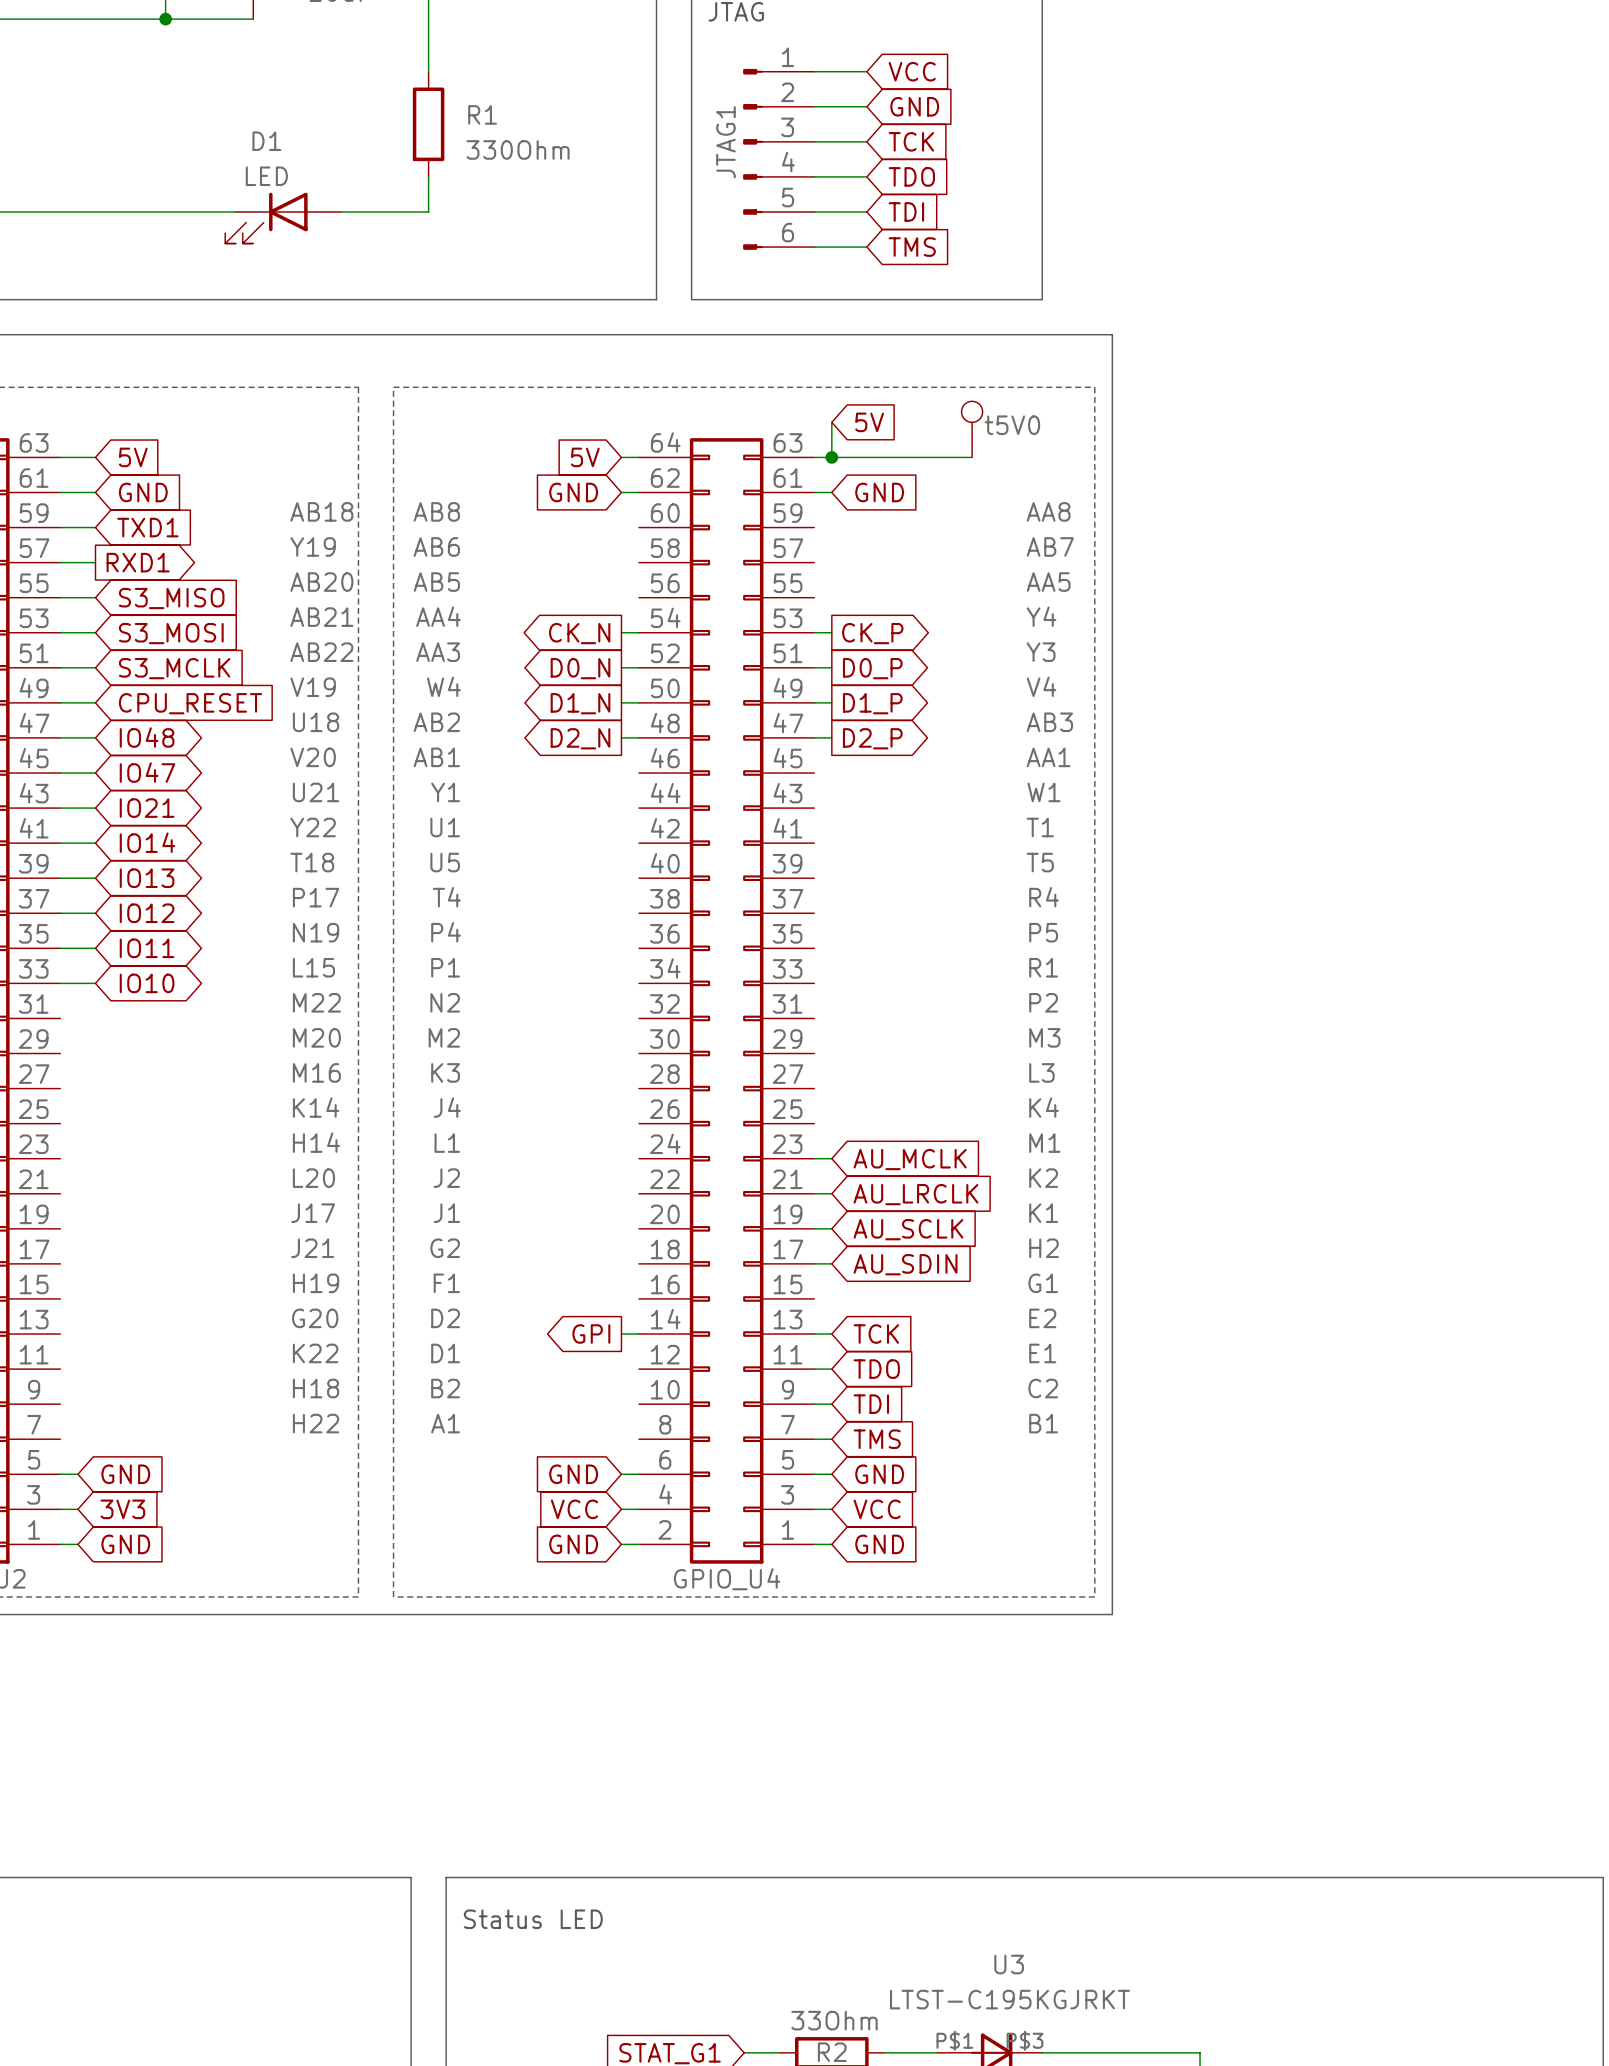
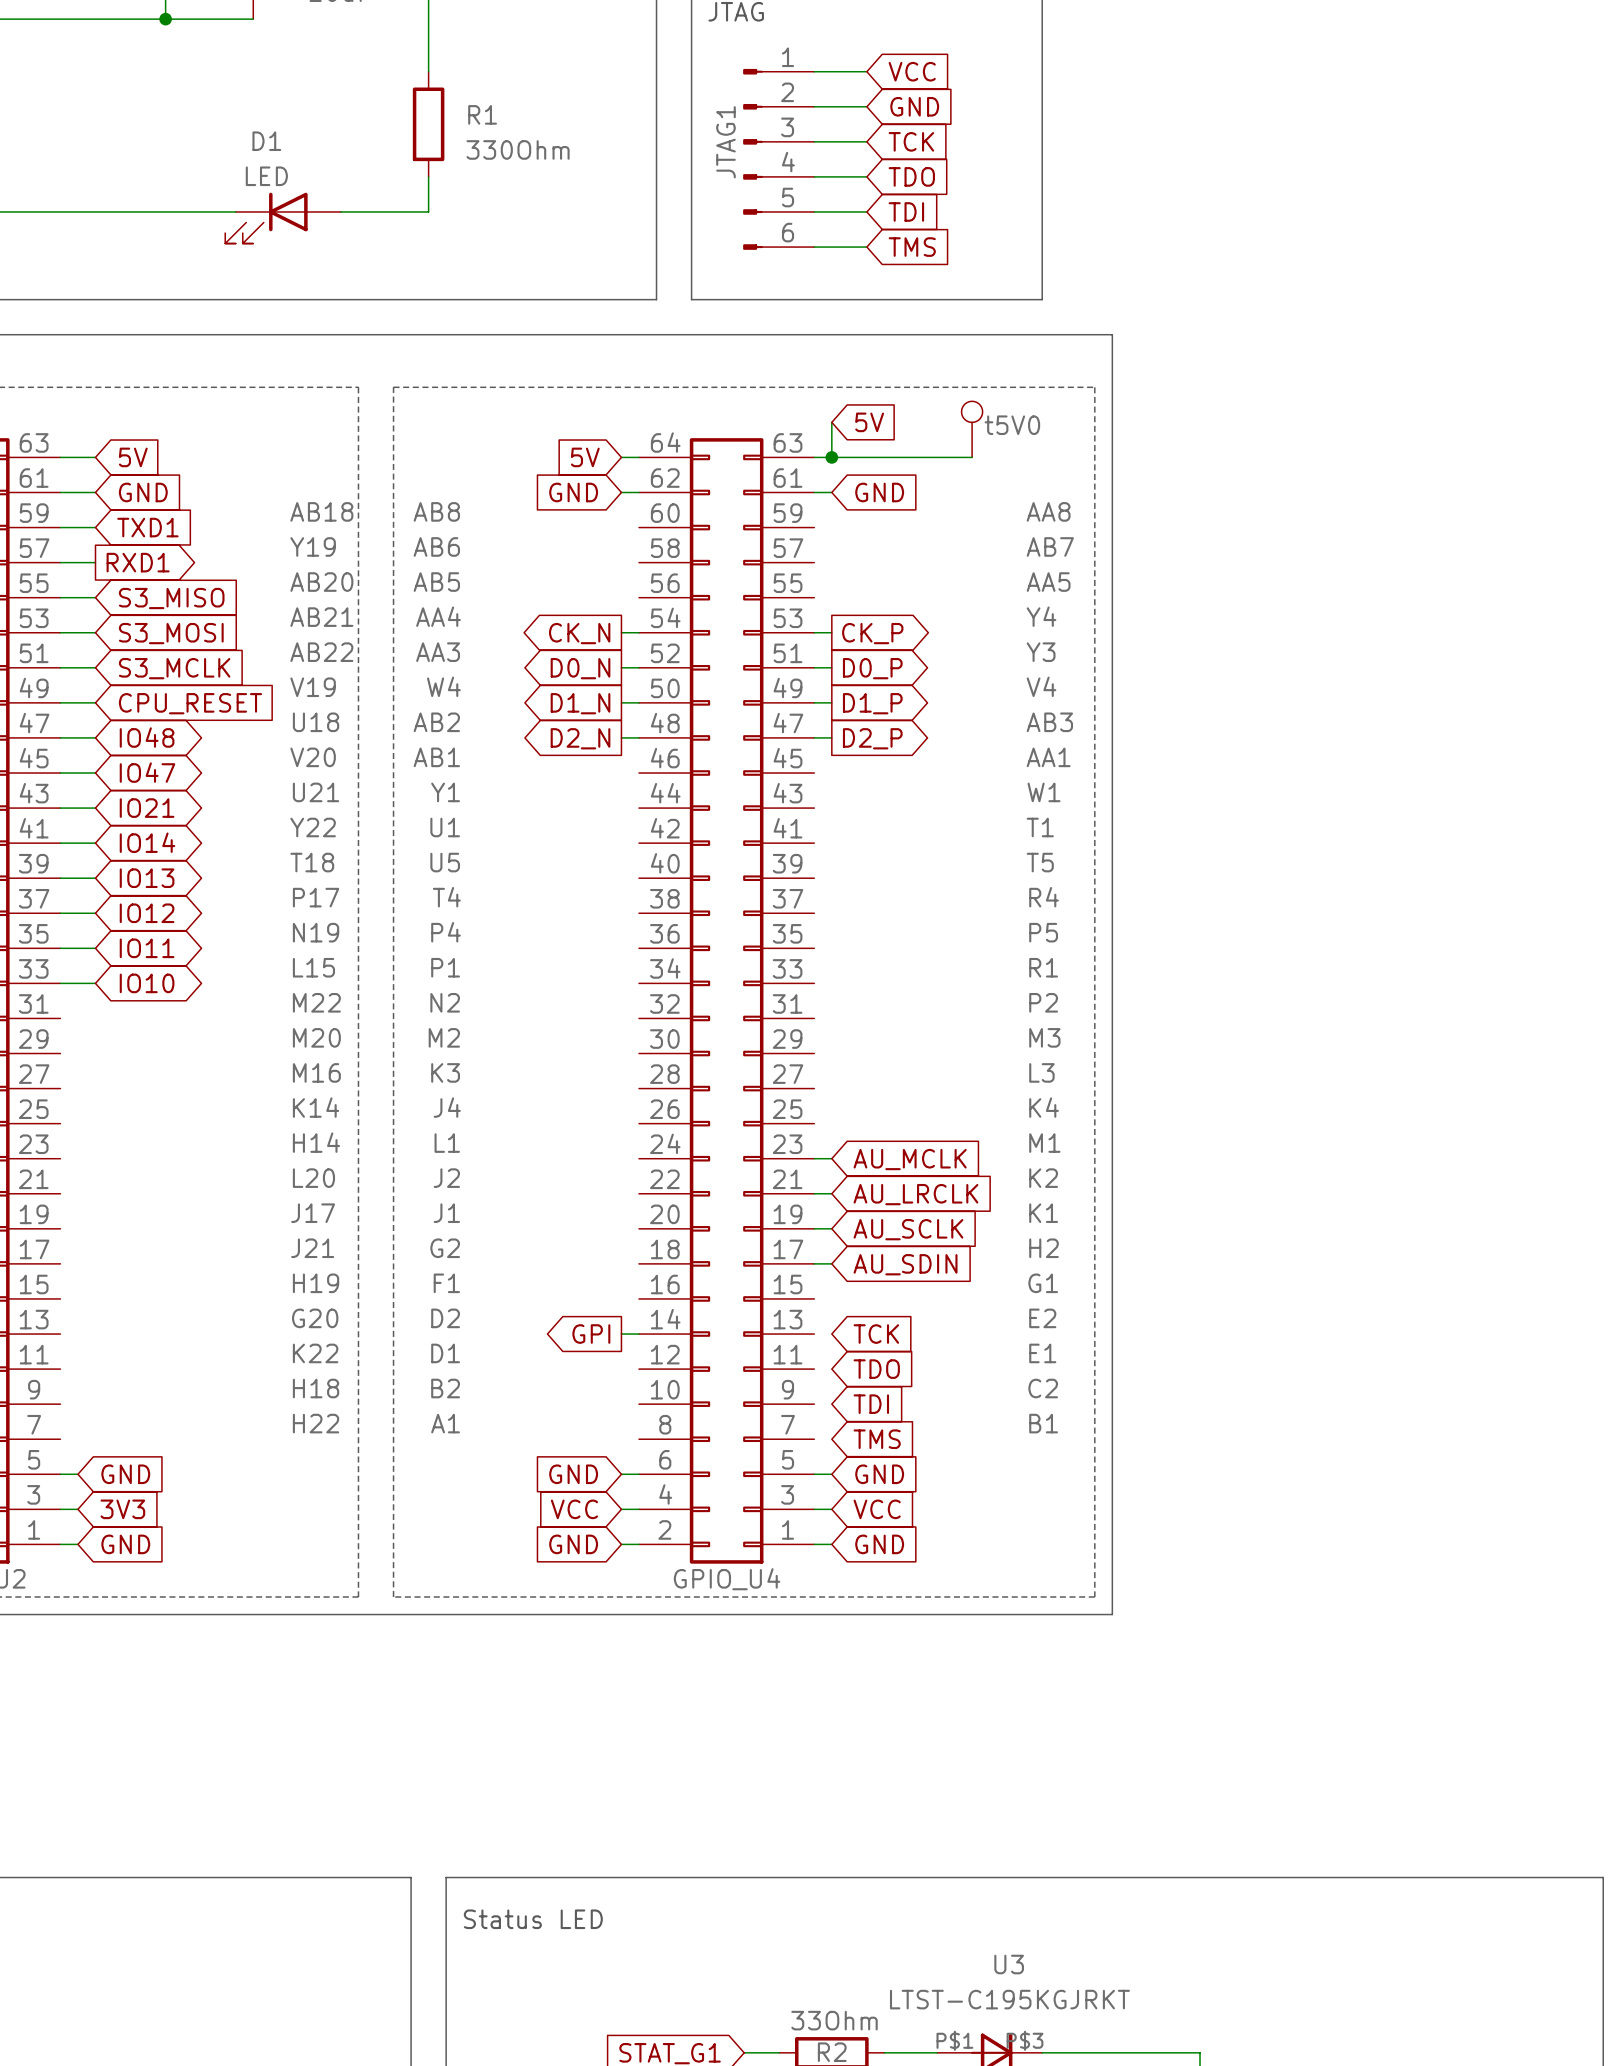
wire: (814, 1334) (831, 1334) -> none
wire: (814, 1369) (831, 1369) -> none
wire: (814, 1404) (831, 1404) -> none
wire: (814, 1439) (831, 1439) -> none

